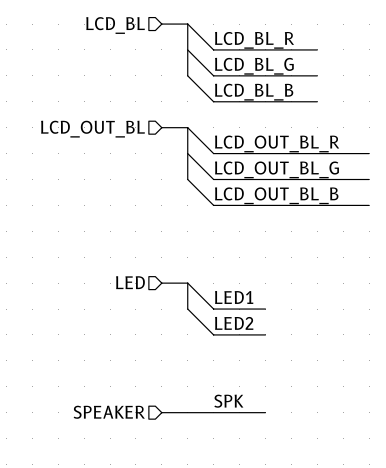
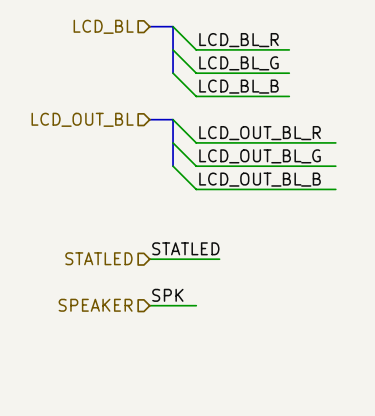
label: none -> STATLED (185, 248)
hierarchical label: LED (130, 282) -> STATLED (98, 258)
wire: none -> (149, 259) (219, 259)
bus: (161, 283) (187, 283) (187, 309) -> none
wire: (187, 283) (213, 309) (265, 309) -> none
label: LED1 (234, 297) -> none
wire: (187, 309) (213, 334) (265, 334) -> none
label: LED2 (234, 323) -> none
wire: none -> (149, 305) (196, 305)
label position: SPK (228, 401) -> SPK (167, 295)
hierarchical label position: SPEAKER (109, 412) -> SPEAKER (95, 305)
wire: (161, 412) (265, 412) -> none

